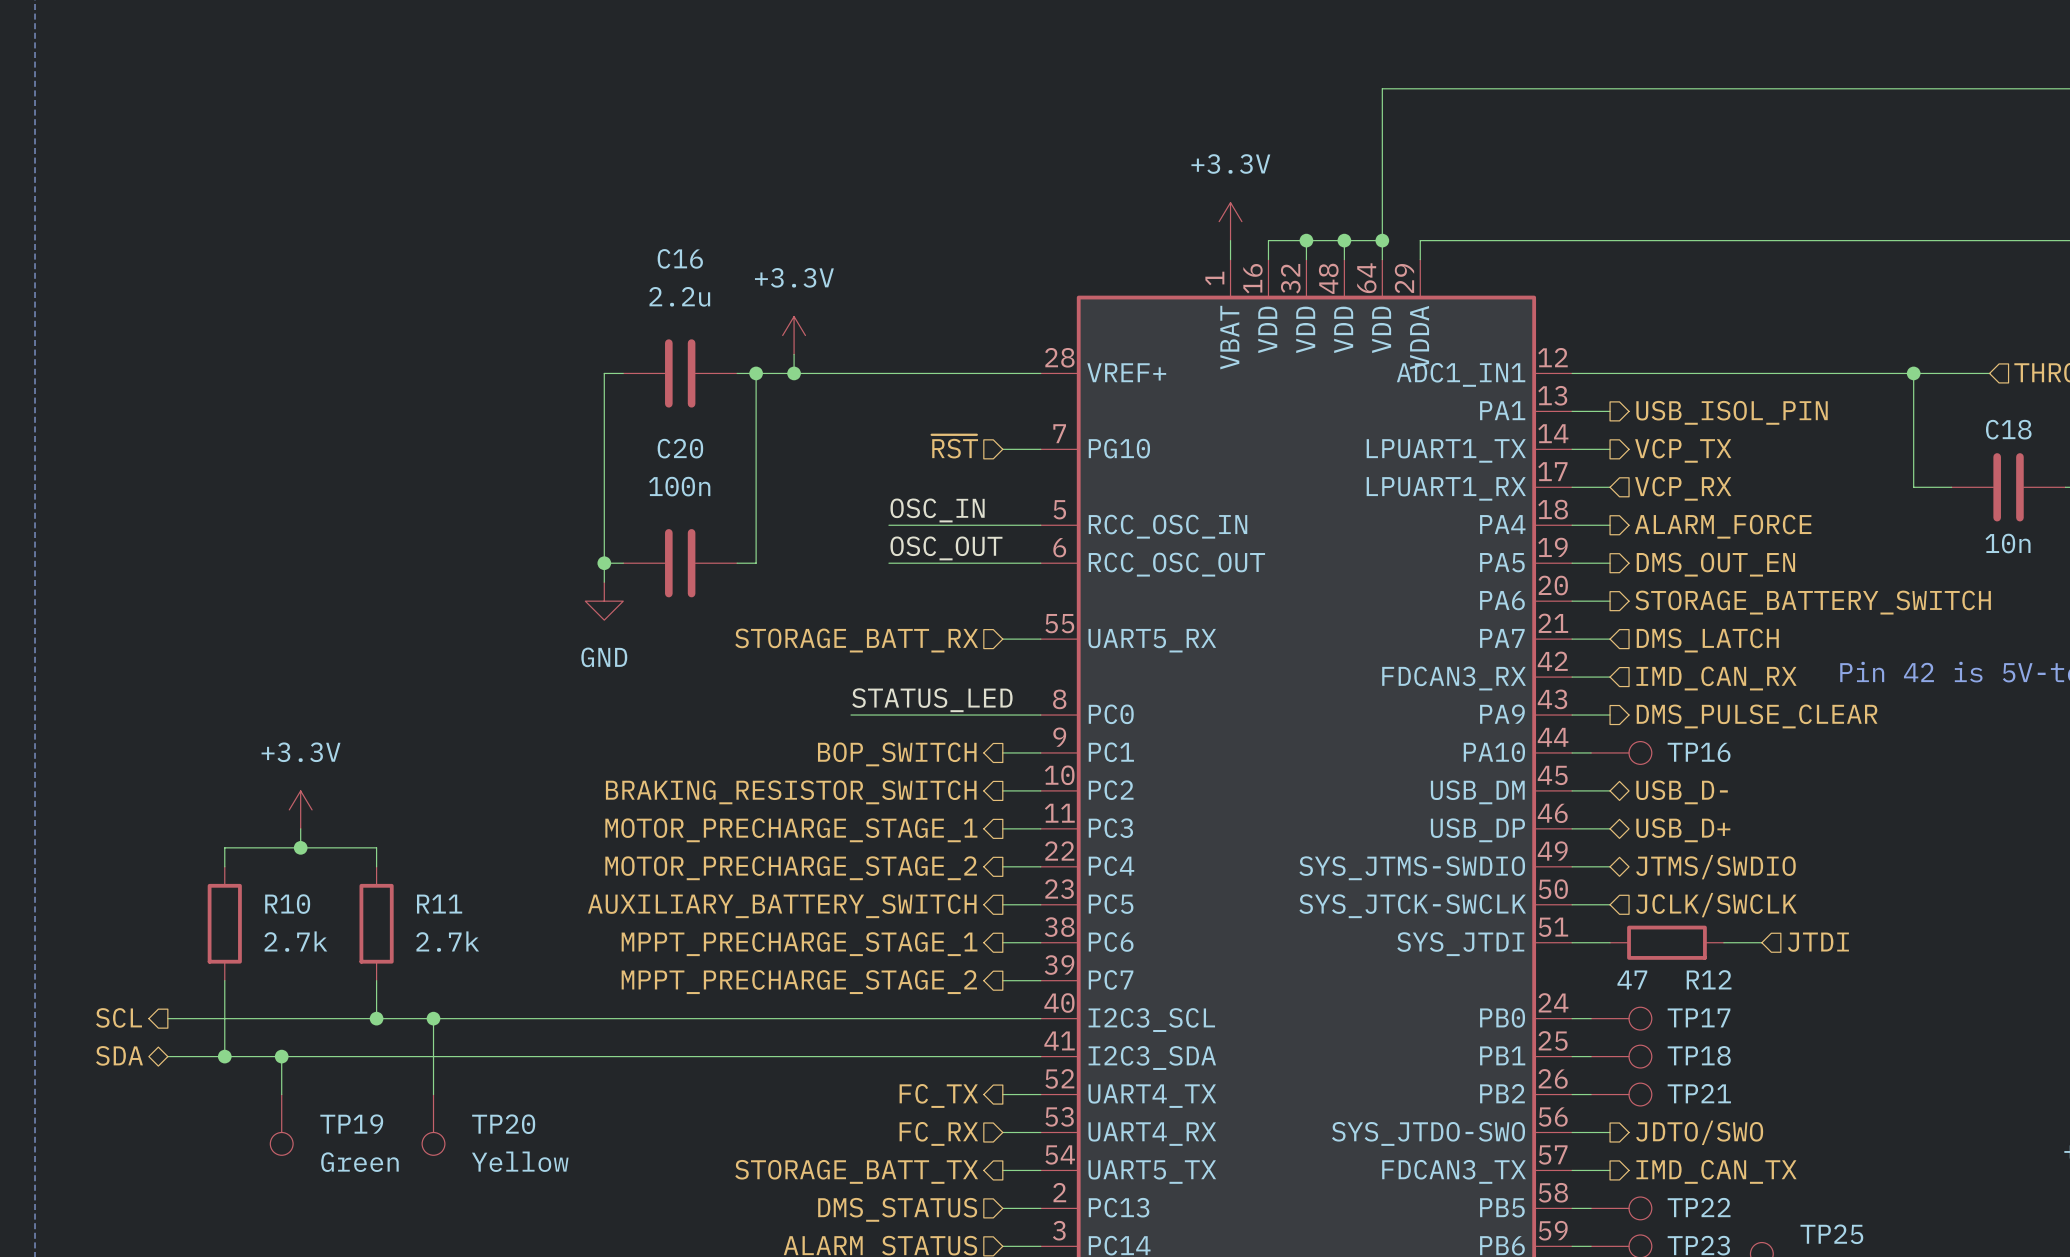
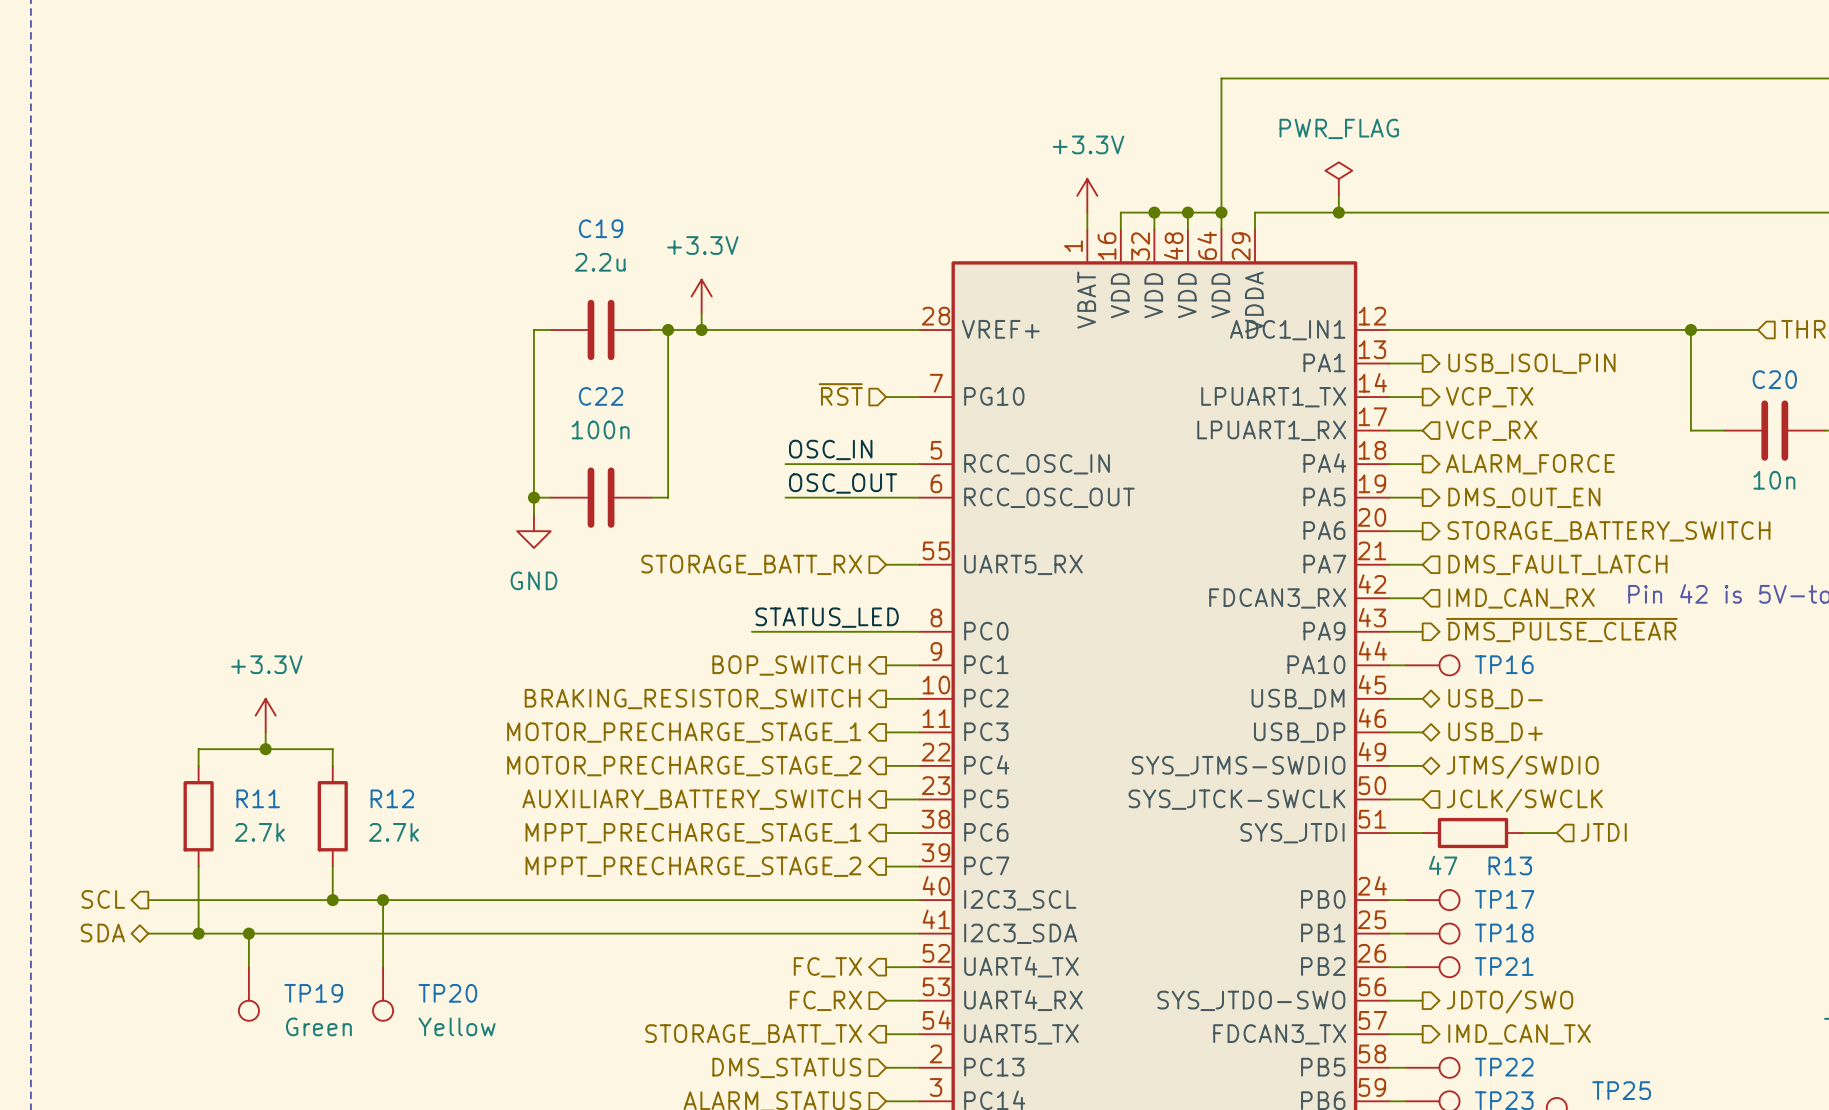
power symbol: none -> PWR_FLAG (1338, 179)
wire: none -> (1338, 195) (1338, 212)
junction: none -> (1338, 212)
C16 name: C16 (680, 258) -> C19 (601, 228)
C18 name: C18 (2008, 429) -> C20 (1774, 379)
C20 name: C20 (680, 448) -> C22 (601, 396)
hierarchical label: DMS_LATCH (1707, 640) -> DMS_FAULT_LATCH (1557, 564)
hierarchical label: DMS_PULSE_CLEAR (1757, 716) -> ~{DMS_PULSE_CLEAR} (1561, 630)
R10 name: R10 (287, 904) -> R11 (258, 798)
R11 name: R11 (439, 904) -> R12 (392, 798)
R12 name: R12 (1709, 979) -> R13 (1510, 865)

